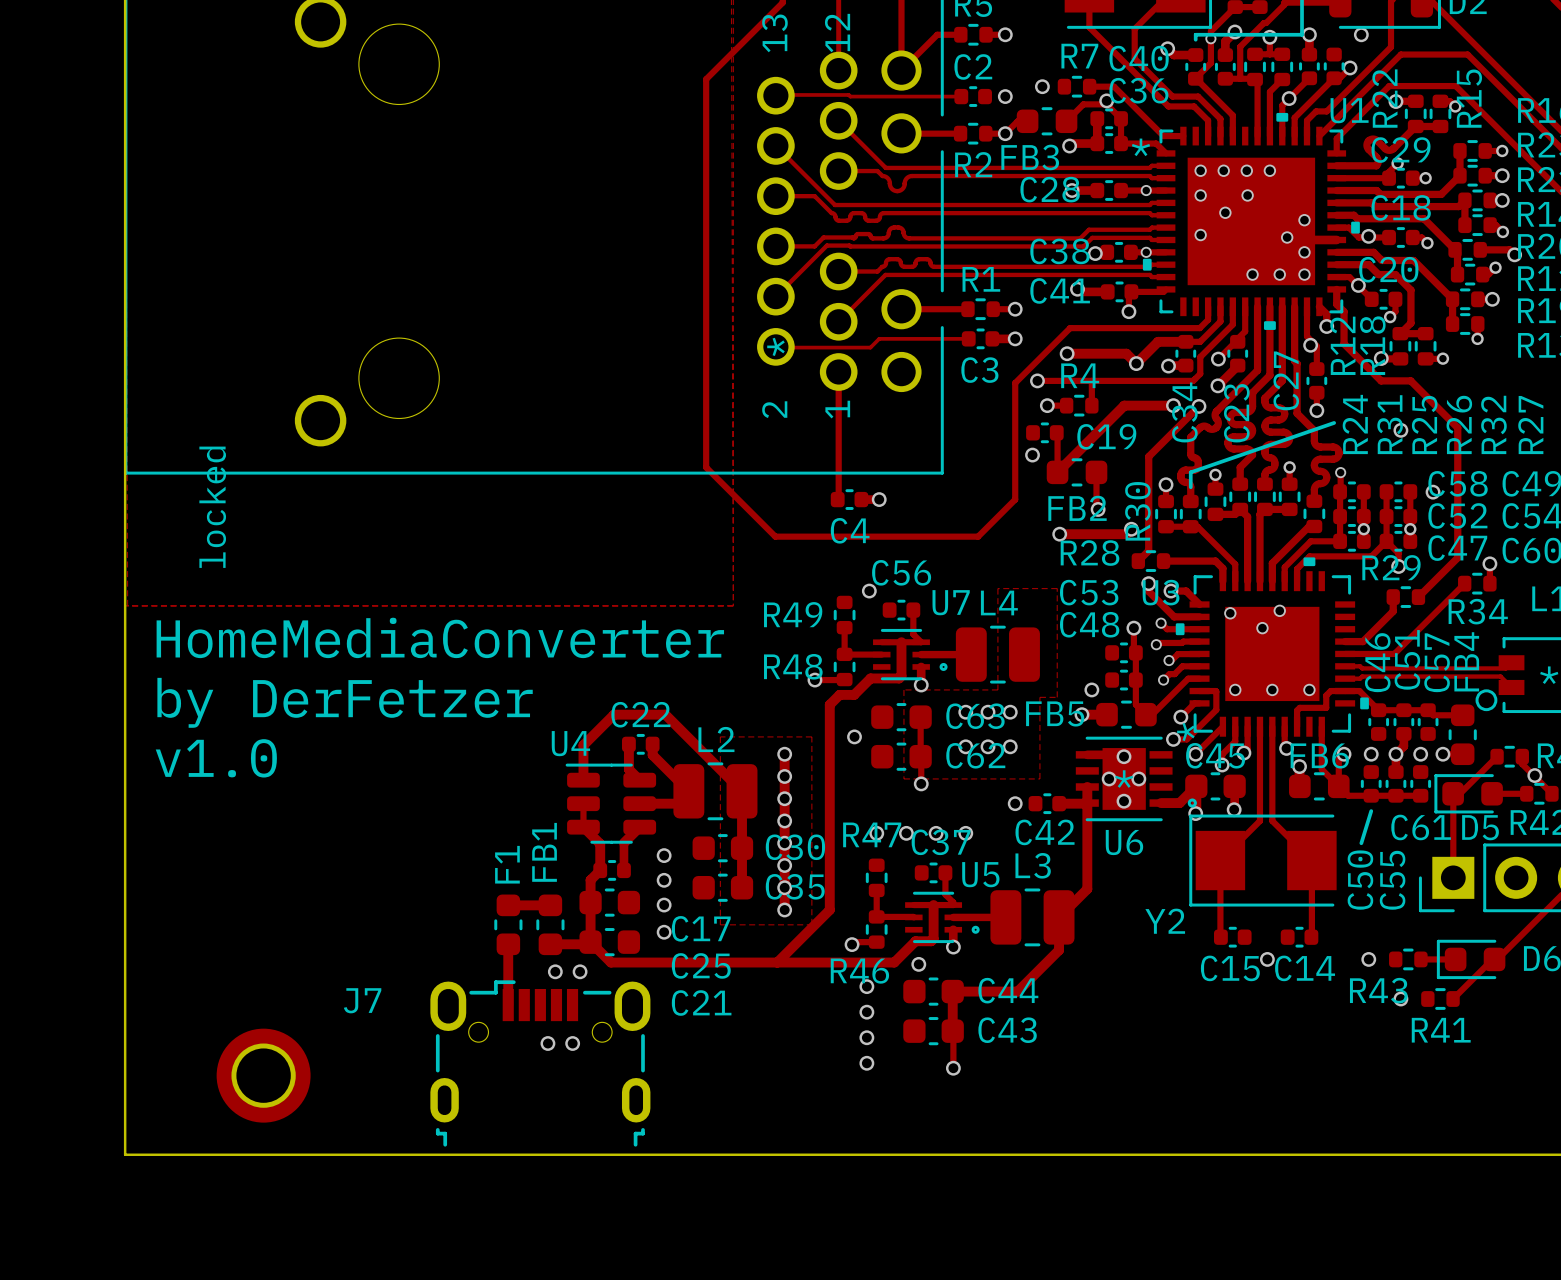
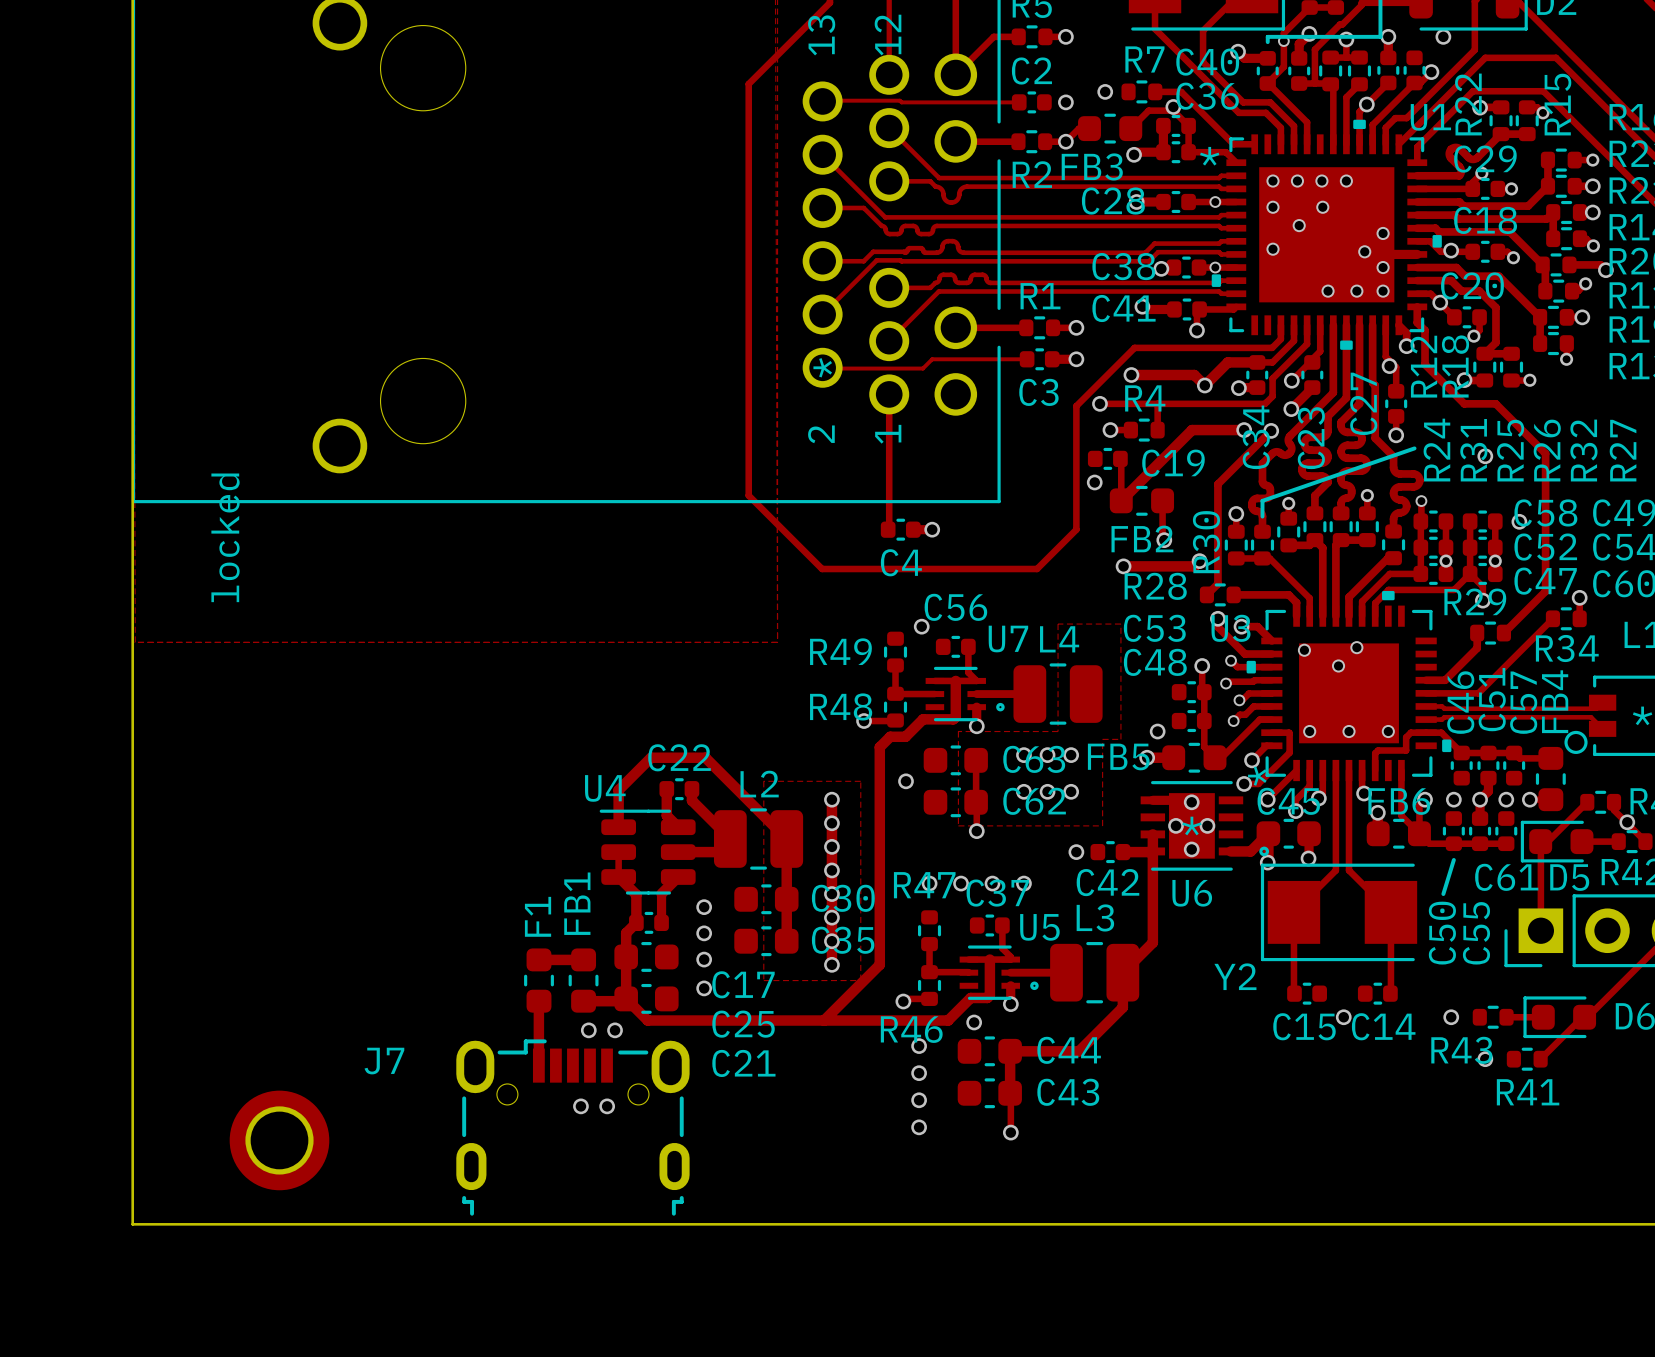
text: HomeMediaConverter (440, 637) -> none
text: by DerFetzer (345, 702) -> none
text: v1.0 (216, 758) -> none

